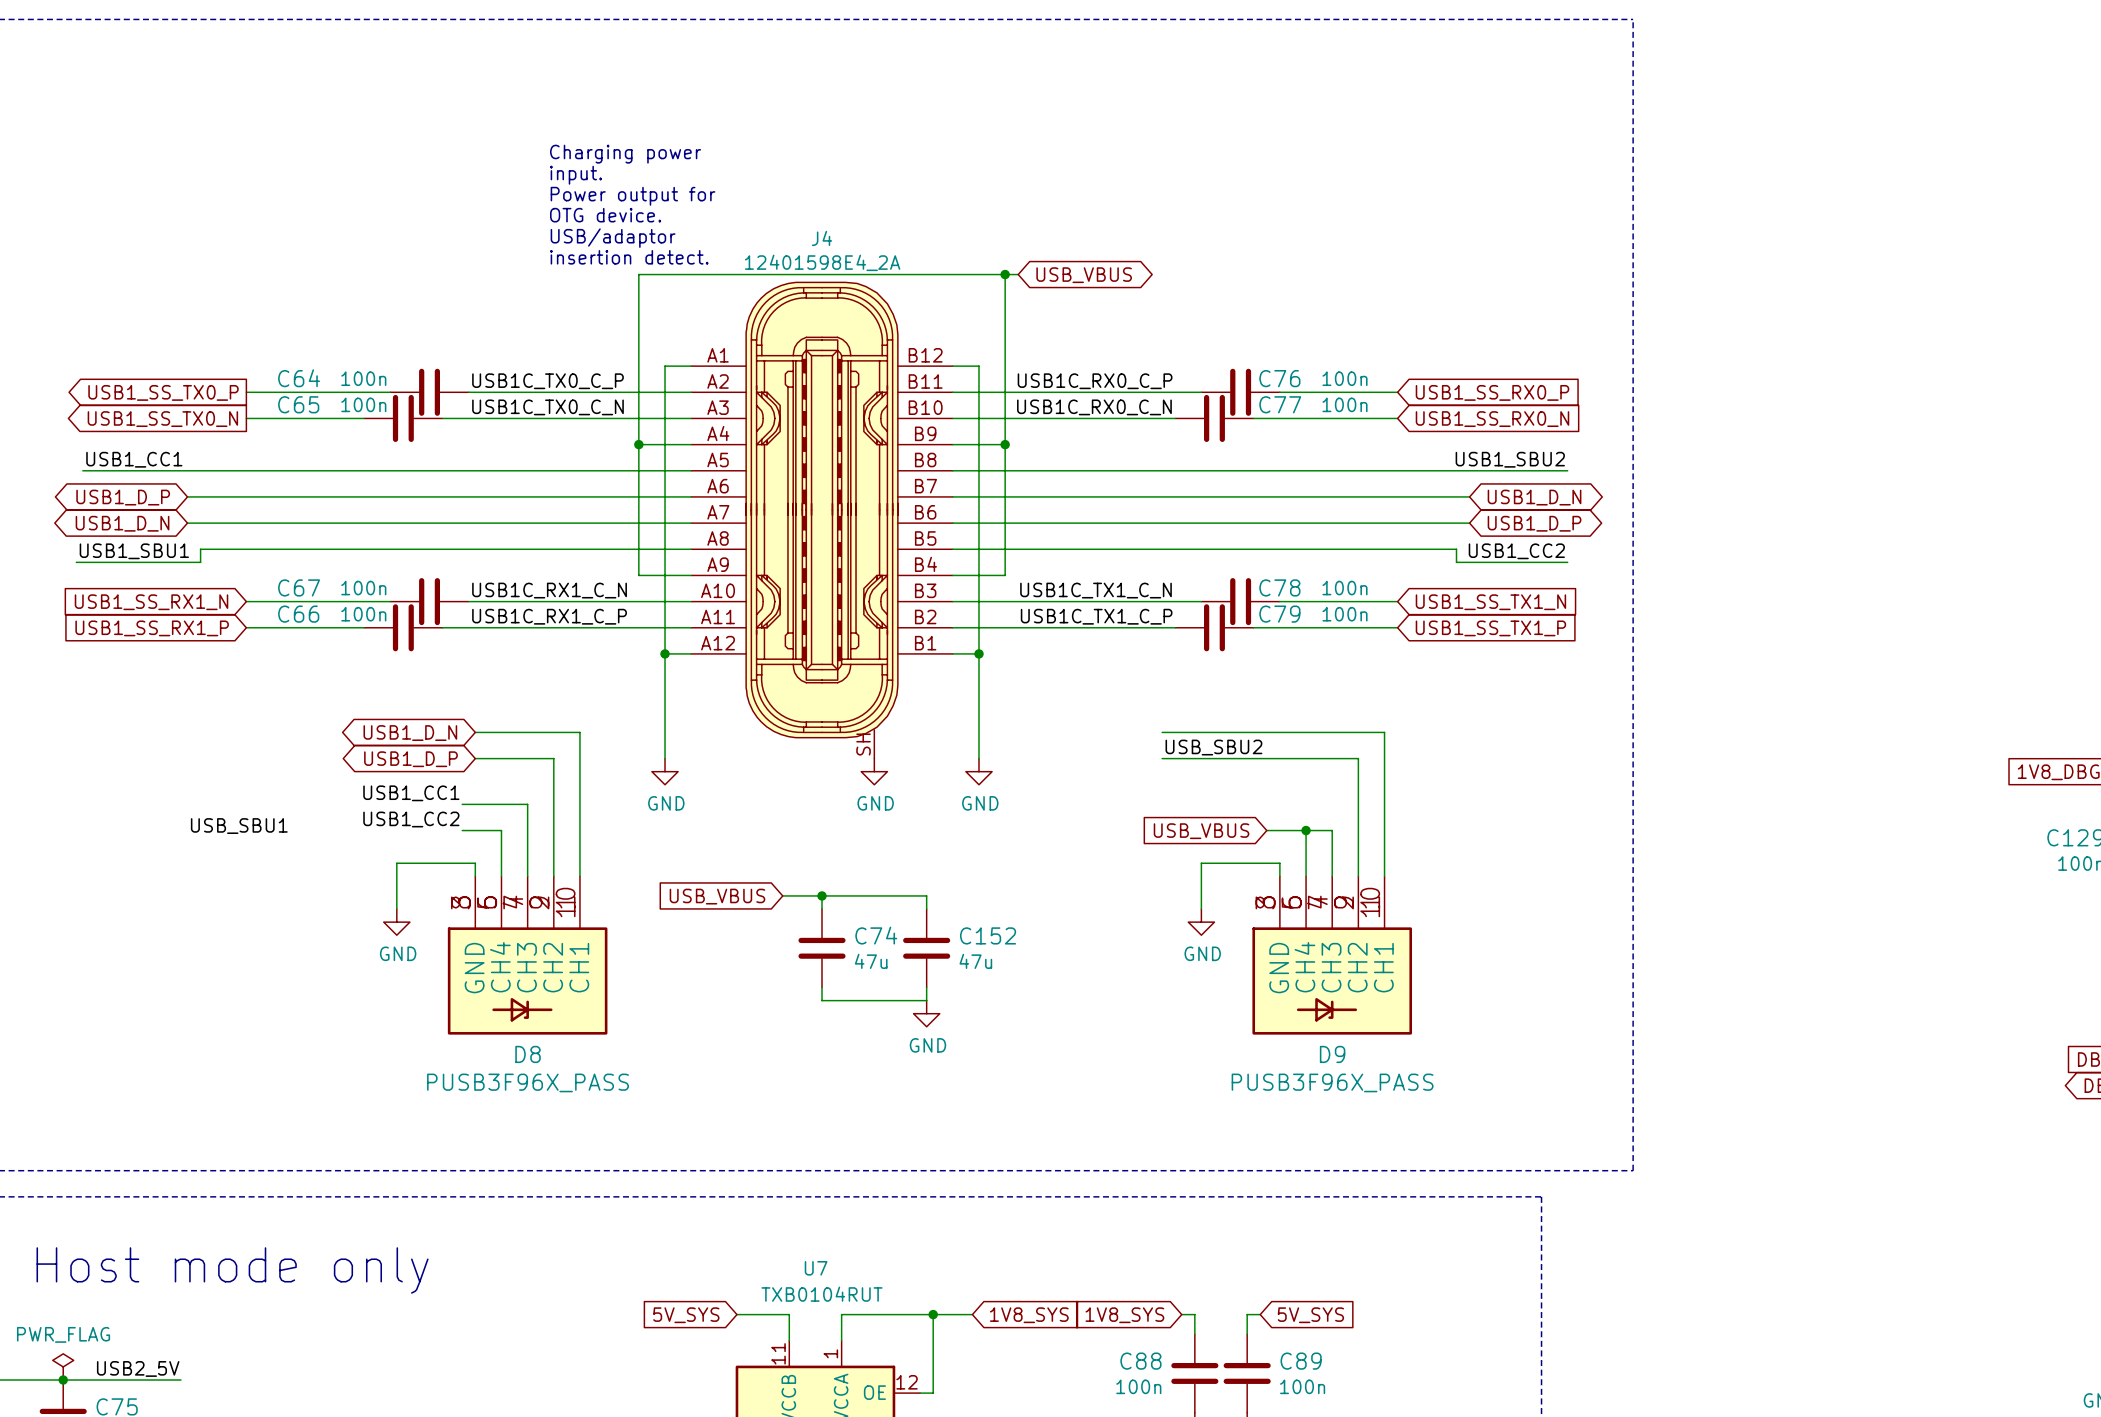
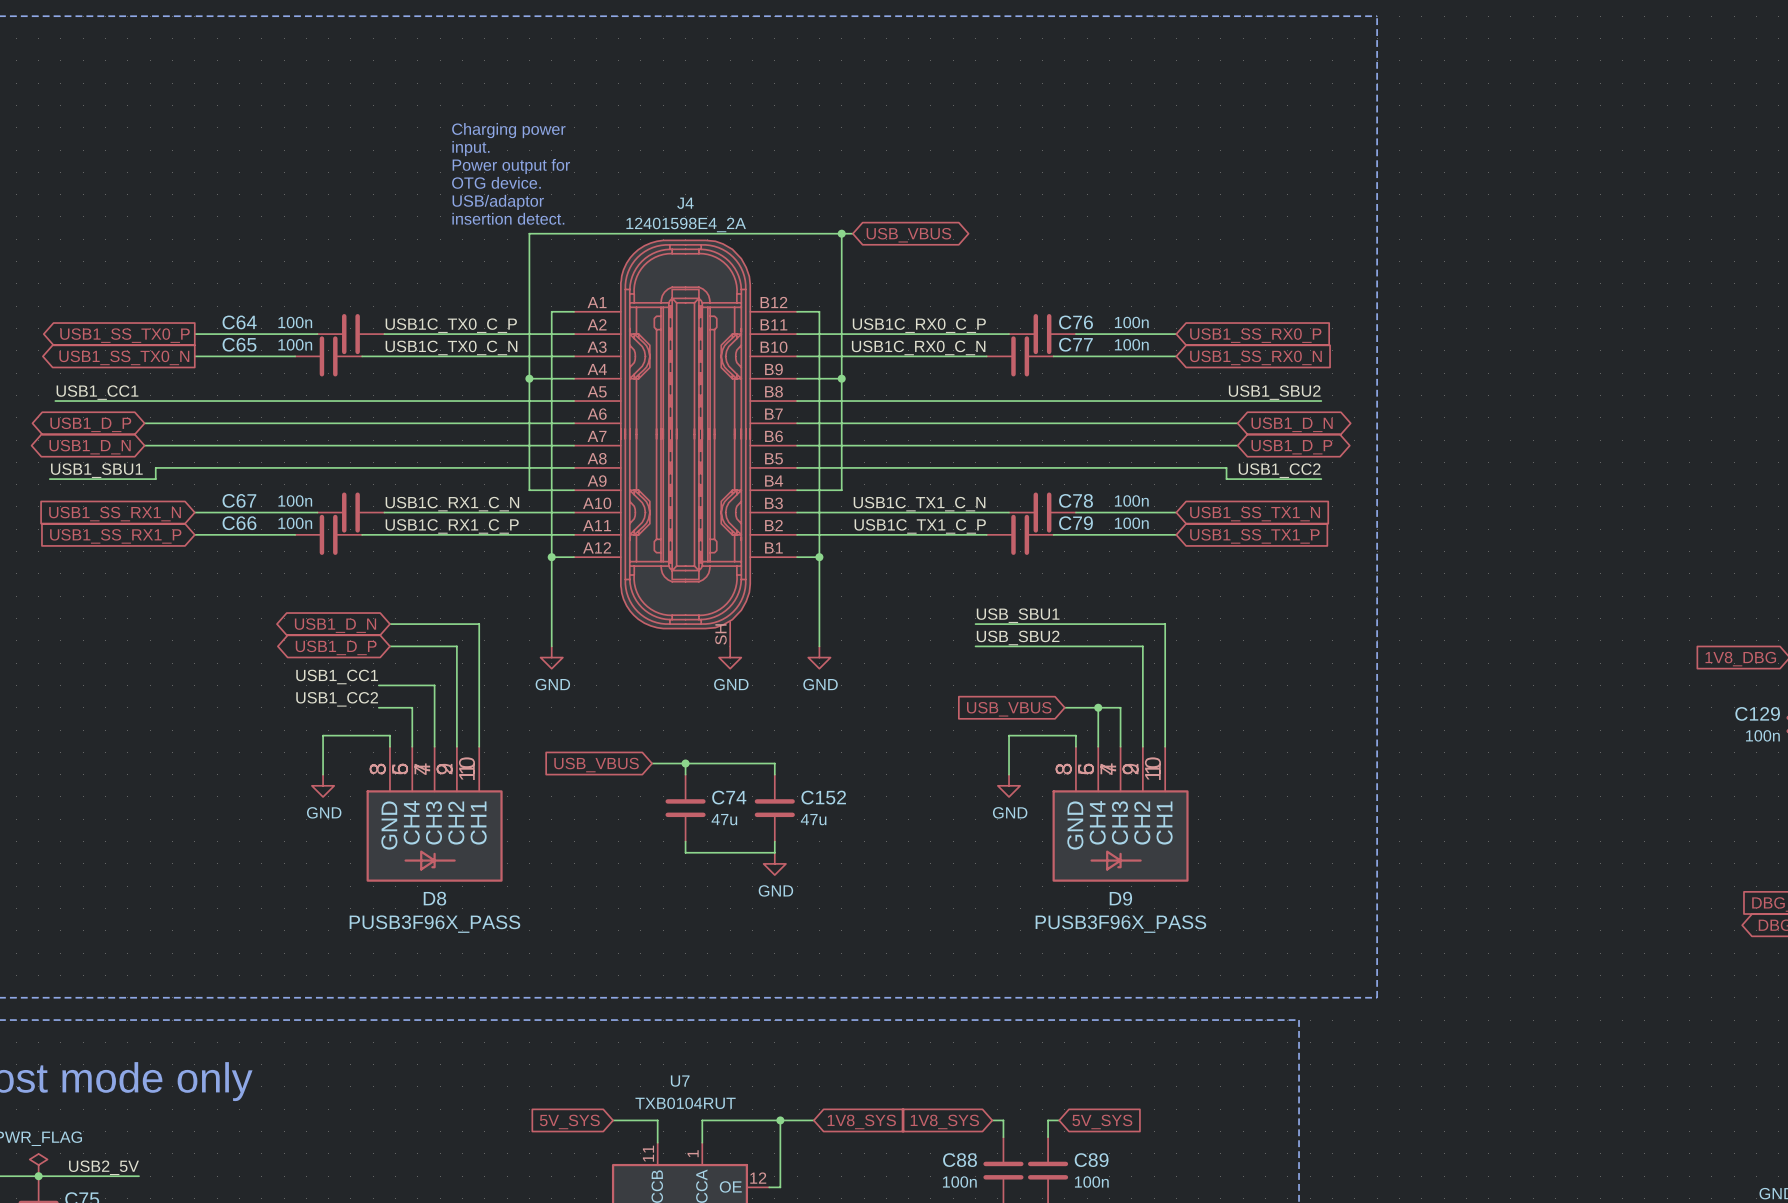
label: none -> USB_SBU1 (1018, 615)
label: USB_SBU1 (239, 826) -> none

